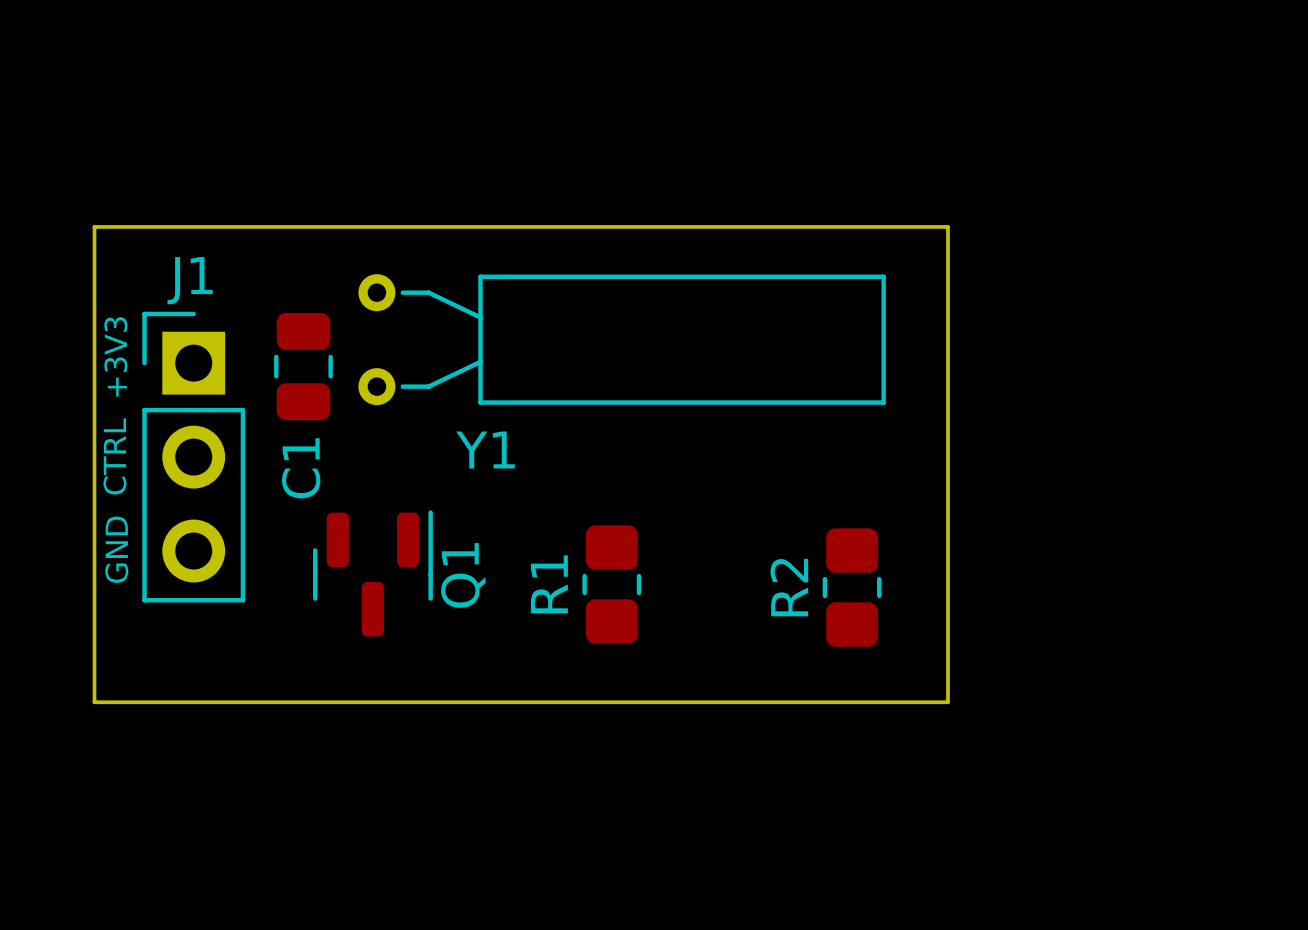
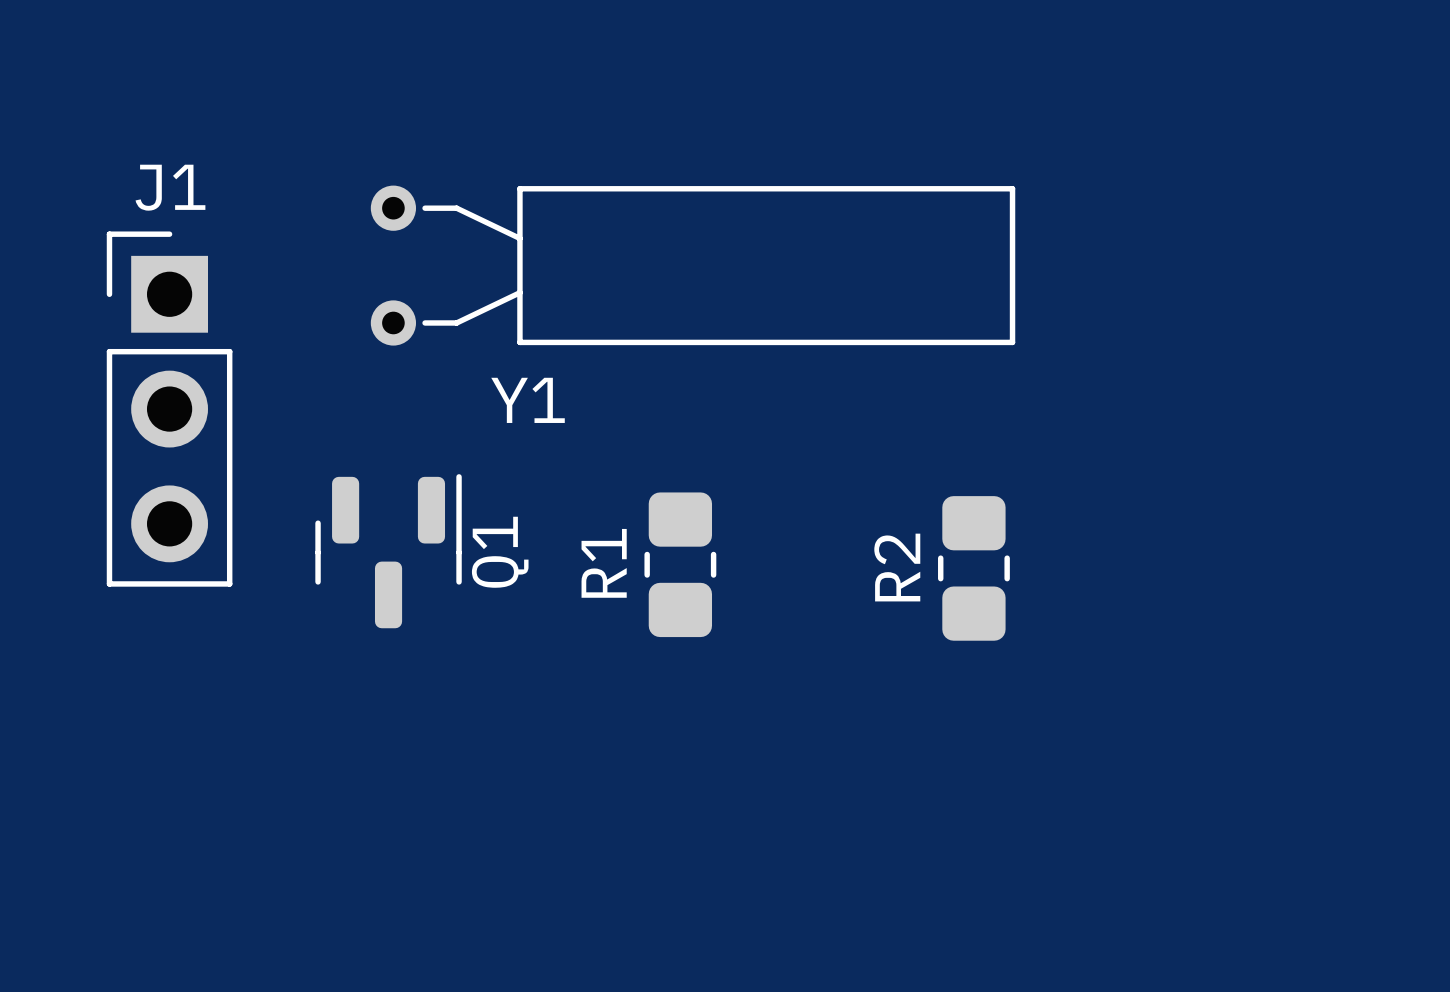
board edge: (94, 226) (947, 226) (947, 702) (94, 702) (94, 226) -> none
text: +3V3 (115, 356) -> none
C1: (303, 366) -> none
text: CTRL (114, 456) -> none
text: GND (116, 549) -> none

